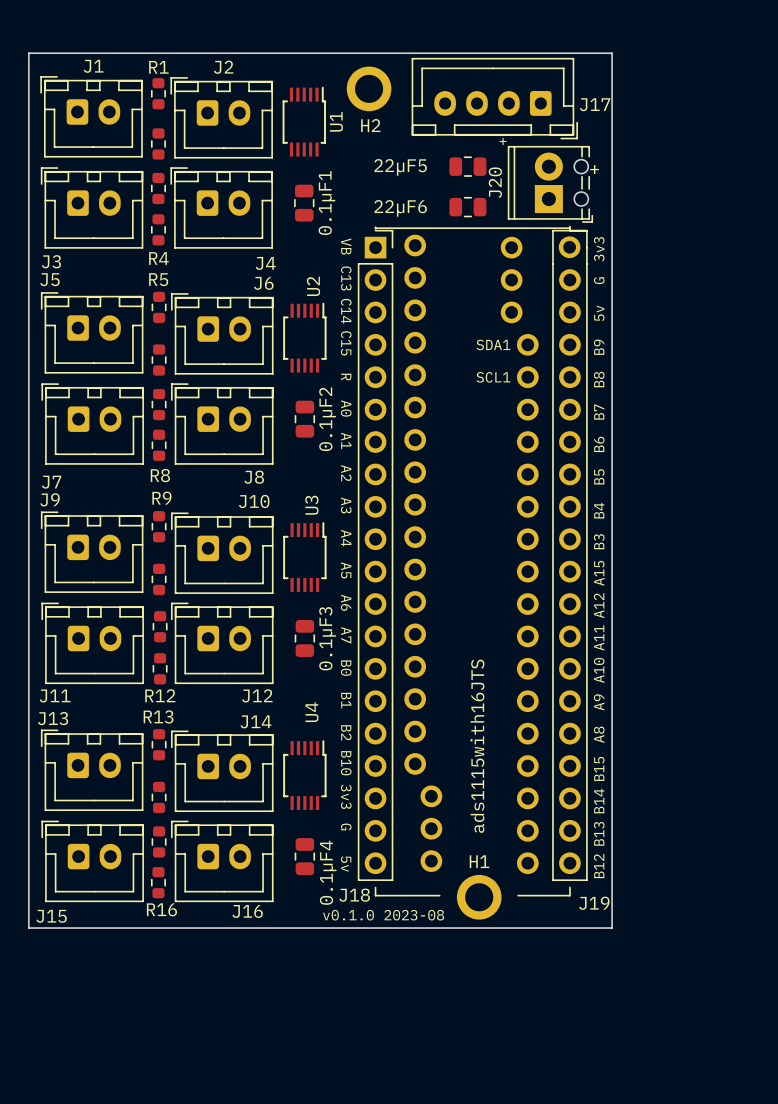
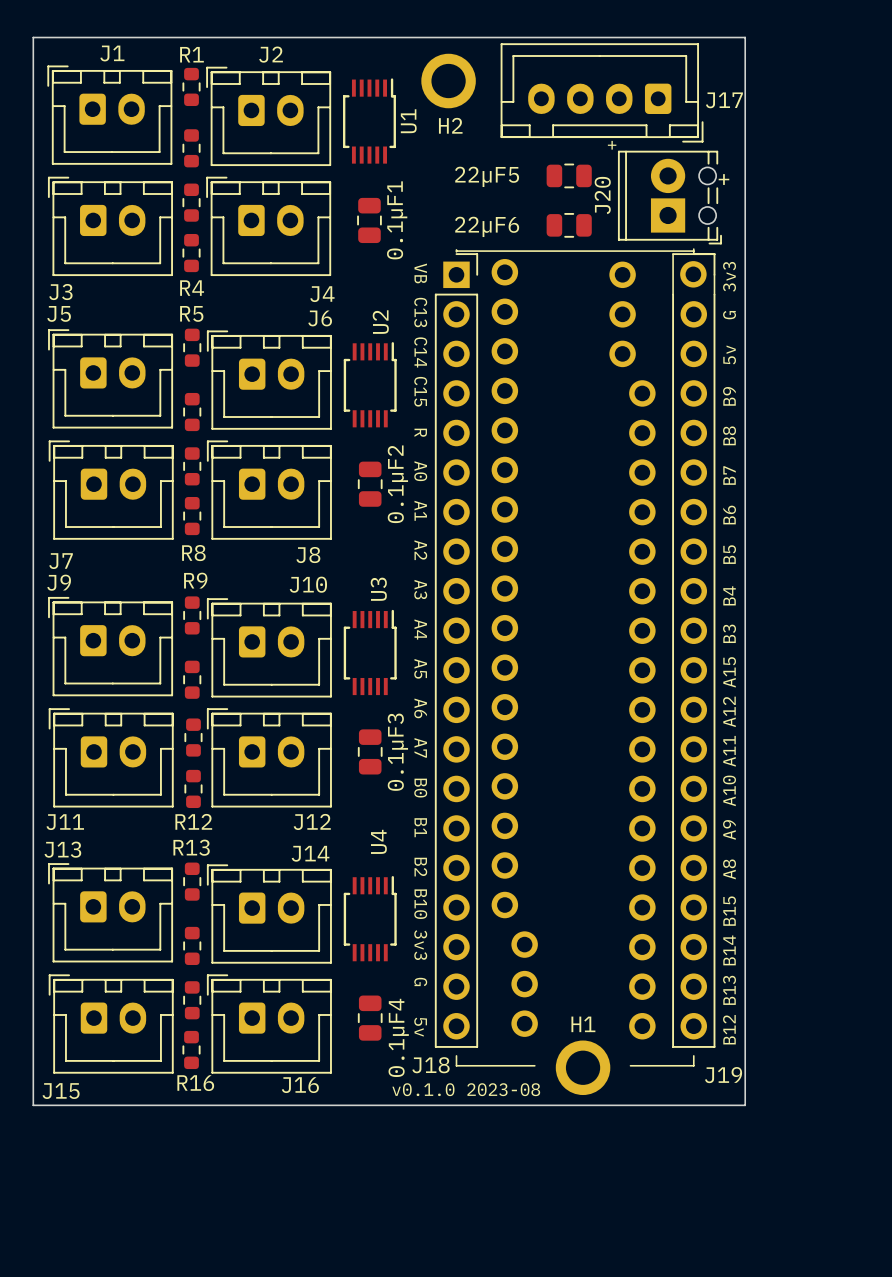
text: SDA1 (493, 344) -> none
text: SCL1 (493, 377) -> none
text: ads1115with16JTS (477, 746) -> none

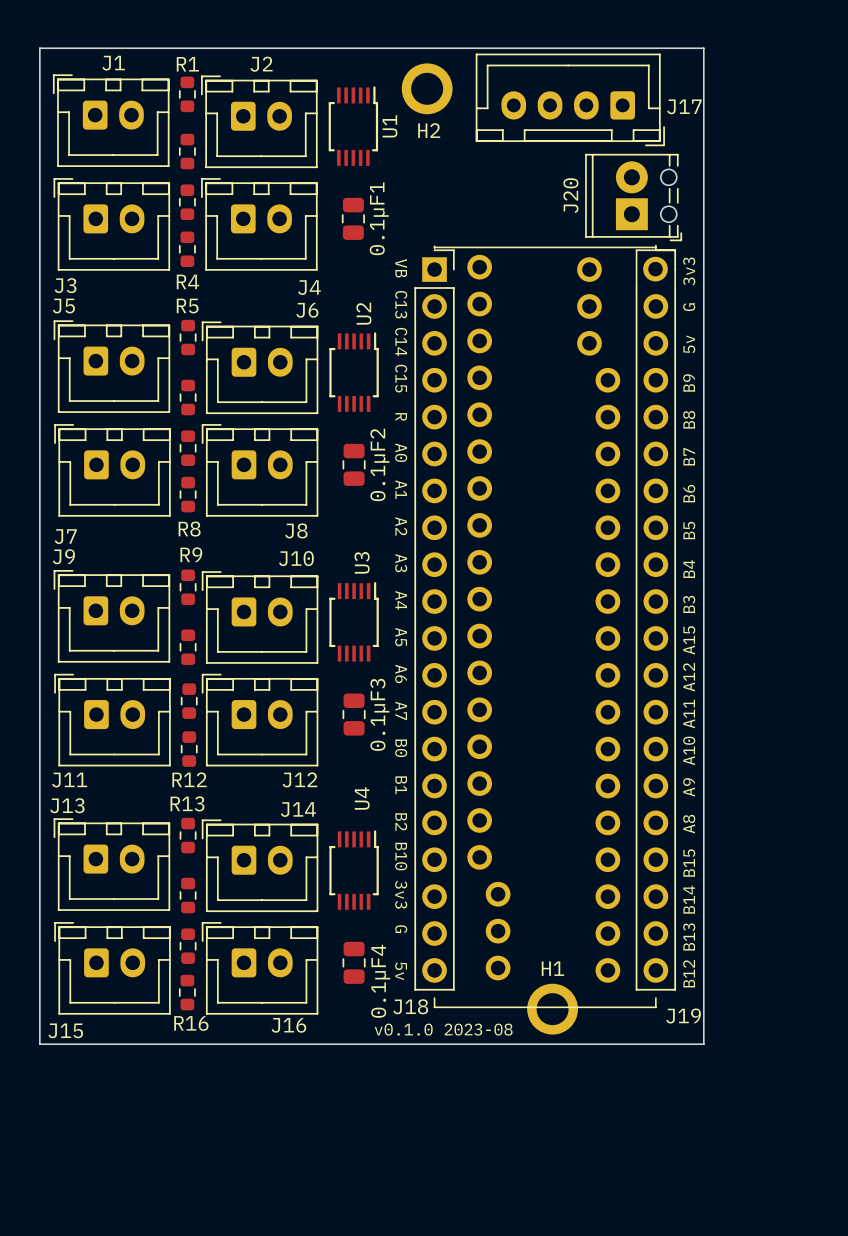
text: + (612, 145) -> none
22µF5: (569, 175) -> none
text: + (723, 179) -> none
22µF6: (569, 225) -> none
J18 footprint: [434, 253, 695, 1067] -> [414, 249, 657, 1009]

